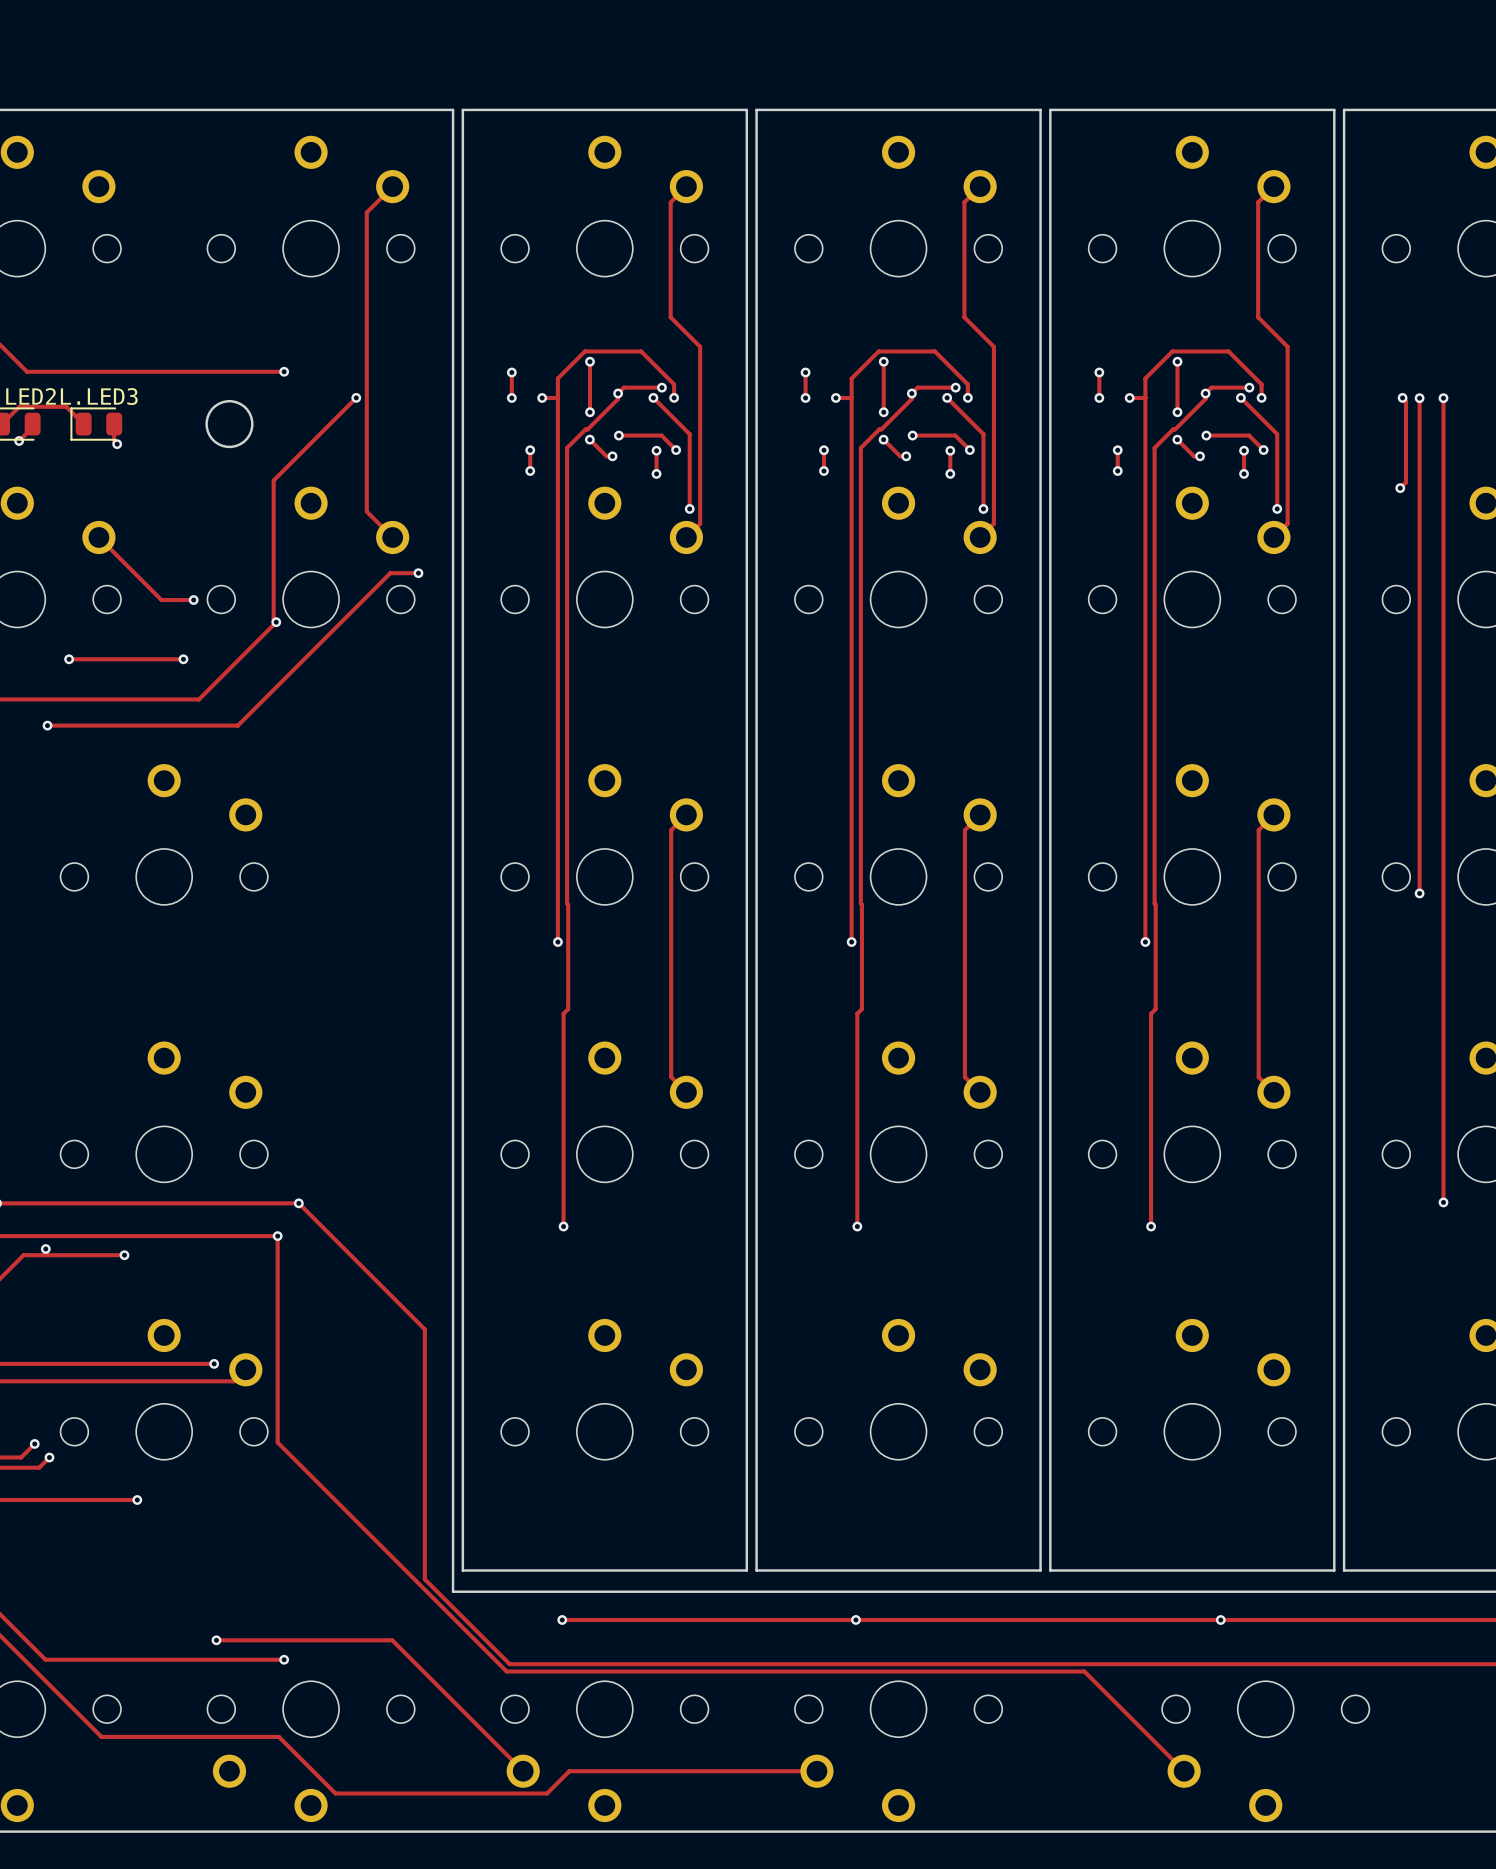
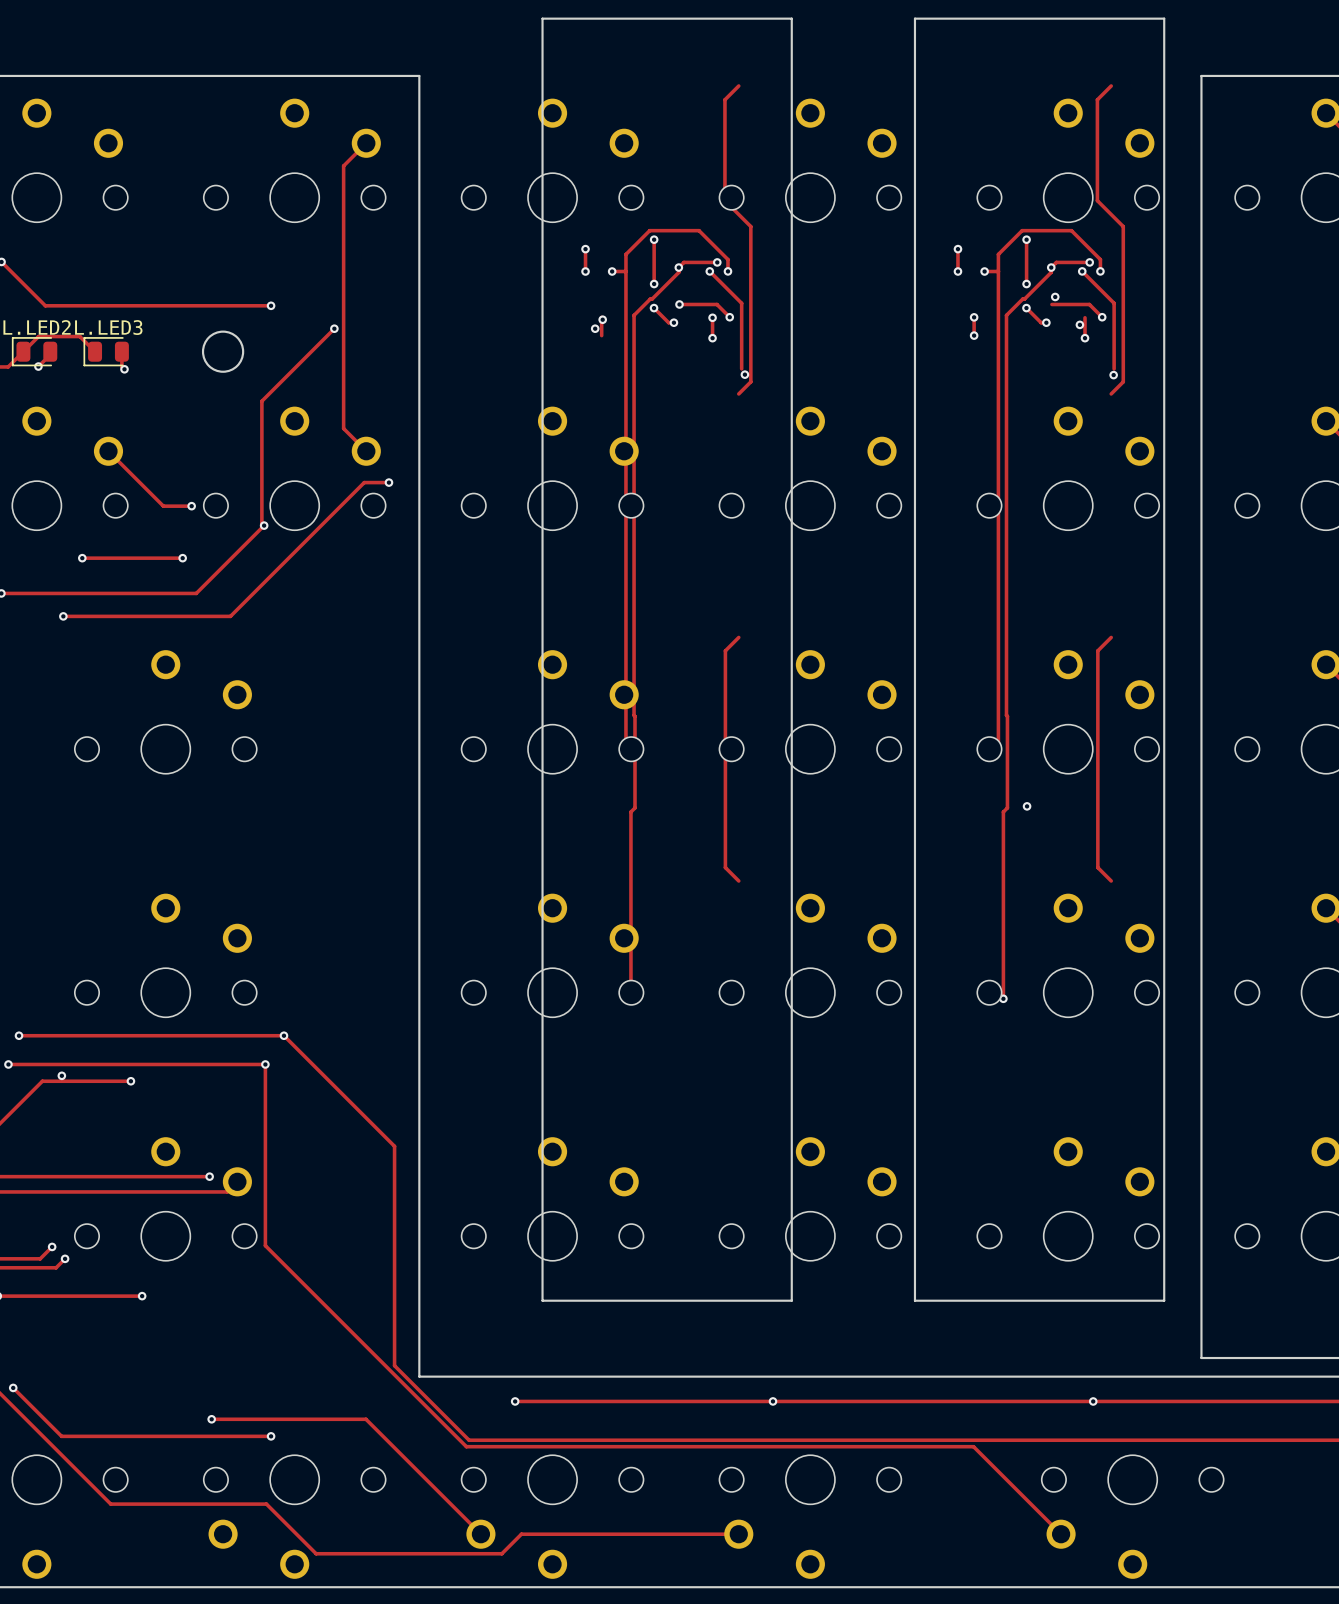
board edge: (462, 109) (462, 1570) (746, 1570) (746, 109) (462, 109) -> (542, 18) (542, 1300) (791, 1300) (791, 18) (542, 18)
board edge: (756, 109) (1040, 109) (1040, 1570) (756, 1570) (756, 109) -> none
board edge: (1050, 109) (1334, 109) (1334, 1570) (1050, 1570) (1050, 109) -> (914, 18) (1164, 18) (1164, 1300) (914, 1300) (914, 18)
track: (686, 186) (670, 202) (670, 317) (700, 346) (700, 523) (686, 537) -> (738, 85) (724, 99) (724, 200) (750, 226) (750, 381) (738, 393)
track: (980, 186) (964, 202) (964, 317) (993, 346) (993, 523) (980, 537) -> none
track: (1273, 186) (1258, 202) (1258, 317) (1287, 346) (1287, 523) (1273, 537) -> (1111, 85) (1097, 99) (1097, 200) (1123, 226) (1123, 381) (1111, 393)
via: none -> (654, 239)
via: none -> (1026, 239)
via: none -> (585, 249)
via: none -> (957, 249)
via: none -> (717, 262)
via: none -> (1089, 262)
via: none -> (678, 267)
via: none -> (1051, 267)
via: none -> (585, 271)
via: none -> (612, 271)
via: none -> (709, 271)
via: none -> (727, 271)
via: none -> (957, 271)
via: none -> (984, 271)
via: none -> (1082, 271)
via: none -> (1100, 271)
via: none -> (654, 284)
via: none -> (1026, 284)
track: (590, 361) (590, 412) -> (654, 239) (654, 284)
via: (590, 361) -> none
track: (883, 361) (883, 412) -> none
via: (883, 361) -> none
track: (1177, 361) (1177, 412) -> (1026, 239) (1026, 284)
via: none -> (679, 304)
track: (511, 372) (511, 397) -> (585, 249) (585, 271)
via: (511, 372) -> none
track: (805, 372) (805, 397) -> none
via: (805, 372) -> none
track: (1099, 372) (1099, 397) -> (957, 249) (957, 271)
via: (1099, 372) -> none
via: none -> (654, 308)
via: none -> (1026, 308)
via: none -> (729, 317)
via: none -> (974, 317)
via: none -> (1102, 317)
via: none -> (712, 317)
track: (661, 387) (623, 387) (618, 393) (618, 399) (567, 447) (568, 1009) (563, 1013) (563, 1226) -> (717, 262) (683, 262) (678, 267) (678, 272) (634, 315) (635, 807) (630, 812) (630, 998)
track: (955, 387) (917, 387) (911, 393) (911, 399) (860, 447) (861, 1009) (857, 1013) (857, 1226) -> none
via: (955, 387) -> none
track: (1249, 387) (1211, 387) (1205, 393) (1205, 399) (1154, 447) (1155, 1009) (1151, 1013) (1151, 1226) -> (1089, 262) (1056, 262) (1051, 267) (1051, 272) (1006, 315) (1007, 807) (1003, 812) (1003, 998)
via: (1249, 387) -> none
via: none -> (673, 322)
via: none -> (1046, 322)
via: (618, 393) -> none
via: (911, 393) -> none
via: (511, 397) -> none
track: (542, 397) (557, 397) -> (612, 271) (625, 271)
via: (542, 397) -> none
track: (653, 397) (689, 434) (689, 508) -> (709, 271) (741, 303) (741, 368)
track: (674, 397) (674, 384) (641, 351) (584, 351) (557, 378) (557, 942) -> (727, 271) (727, 259) (699, 230) (649, 230) (625, 254) (625, 749)
via: (674, 397) -> none
via: (805, 397) -> none
track: (835, 397) (851, 397) -> none
via: (835, 397) -> none
track: (947, 397) (983, 434) (983, 508) -> none
via: (947, 397) -> none
track: (967, 397) (967, 384) (934, 351) (878, 351) (851, 378) (851, 942) -> none
via: (967, 397) -> none
via: (1099, 397) -> none
track: (1129, 397) (1145, 397) -> (984, 271) (998, 271)
via: (1129, 397) -> none
track: (1240, 397) (1277, 434) (1277, 508) -> (1082, 271) (1114, 303) (1114, 368)
via: (1240, 397) -> none
track: (1261, 397) (1261, 384) (1228, 351) (1172, 351) (1145, 378) (1145, 942) -> (1100, 271) (1100, 259) (1071, 230) (1022, 230) (998, 254) (998, 749)
via: (1261, 397) -> none
track: (1402, 397) (1405, 401) (1405, 482) (1400, 488) -> none
via: (1402, 397) -> none
track: (1419, 398) (1419, 893) -> none
via: (1419, 398) -> none
track: (1443, 398) (1443, 1202) -> none
via: (1443, 398) -> none
via: none -> (974, 335)
via: none -> (712, 338)
via: none -> (1085, 338)
via: (590, 412) -> none
via: (883, 412) -> none
via: (1177, 412) -> none
track: (618, 435) (661, 435) (676, 450) -> (679, 304) (717, 304) (729, 317)
via: (618, 435) -> none
track: (912, 435) (955, 435) (969, 450) -> none
via: (912, 435) -> none
track: (1206, 435) (1249, 435) (1263, 450) -> (1051, 304) (1089, 304) (1102, 317)
via: (1206, 435) -> none
track: (589, 439) (606, 456) (612, 456) -> (654, 308) (668, 322) (673, 322)
via: (589, 439) -> none
track: (883, 439) (900, 456) (906, 456) -> none
via: (883, 439) -> none
track: (1177, 439) (1194, 456) (1200, 456) -> (1026, 308) (1041, 322) (1046, 322)
via: (1177, 439) -> none
track: (530, 450) (530, 471) -> (601, 317) (601, 335)
via: (530, 450) -> none
track: (656, 450) (656, 473) -> (712, 317) (712, 338)
via: (656, 450) -> none
via: (676, 450) -> none
track: (823, 450) (823, 471) -> none
track: (950, 450) (950, 473) -> none
via: (950, 450) -> none
via: (969, 450) -> none
track: (1117, 450) (1117, 471) -> (974, 317) (974, 335)
via: (1117, 450) -> none
track: (1244, 450) (1244, 473) -> (1085, 317) (1085, 338)
via: (1263, 450) -> none
via: (612, 456) -> none
via: (906, 456) -> none
via: (1200, 456) -> none
via: (530, 471) -> none
via: (823, 471) -> none
via: (1117, 471) -> none
via: (656, 473) -> none
via: (950, 473) -> none
via: (1244, 473) -> none
via: (1400, 488) -> none
via: (689, 508) -> none
via: (983, 508) -> none
via: (1277, 508) -> none
track: (686, 814) (671, 830) (671, 1077) (686, 1092) -> (738, 637) (725, 650) (725, 867) (738, 881)
track: (980, 814) (964, 830) (964, 1077) (980, 1092) -> none
track: (1273, 814) (1258, 830) (1258, 1077) (1273, 1092) -> (1111, 637) (1097, 650) (1097, 867) (1111, 881)
via: (1419, 893) -> none
via: (557, 942) -> none
via: (851, 942) -> none
via: (1443, 1202) -> none
via: (563, 1226) -> none
via: (857, 1226) -> none
via position: (1151, 1226) -> (1003, 998)

